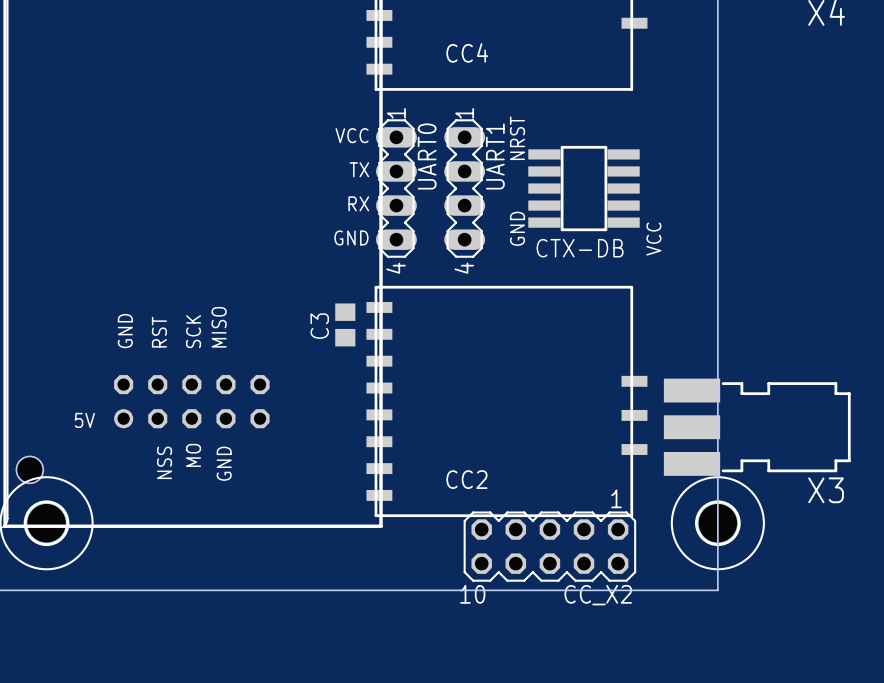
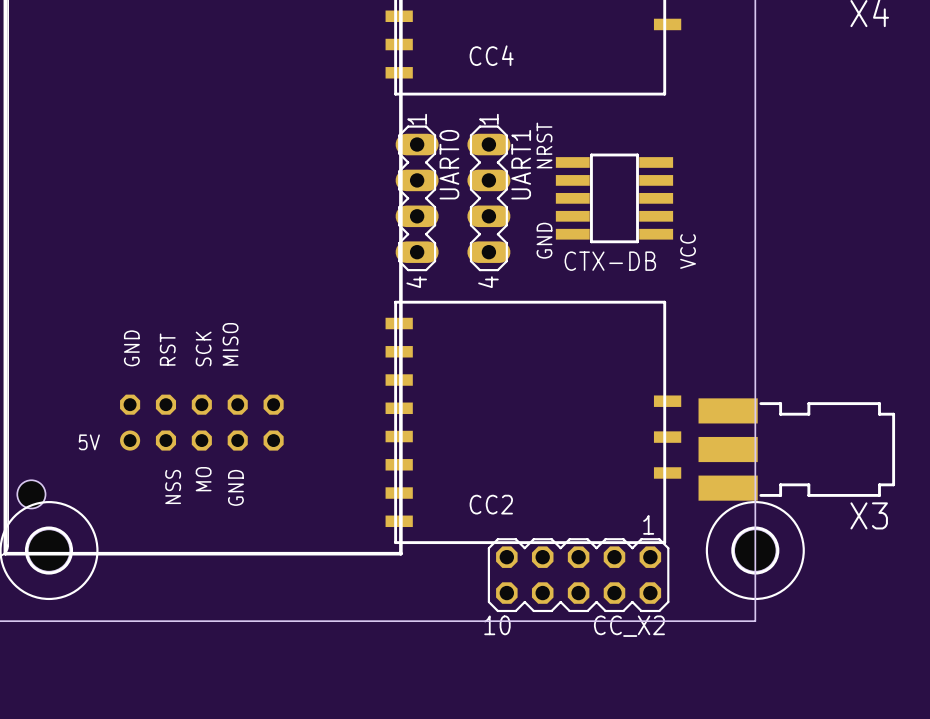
text: VCC (352, 135) -> none
text: TX (359, 169) -> none
text: RX (358, 203) -> none
text: GND (351, 237) -> none
C3: (345, 324) -> none

